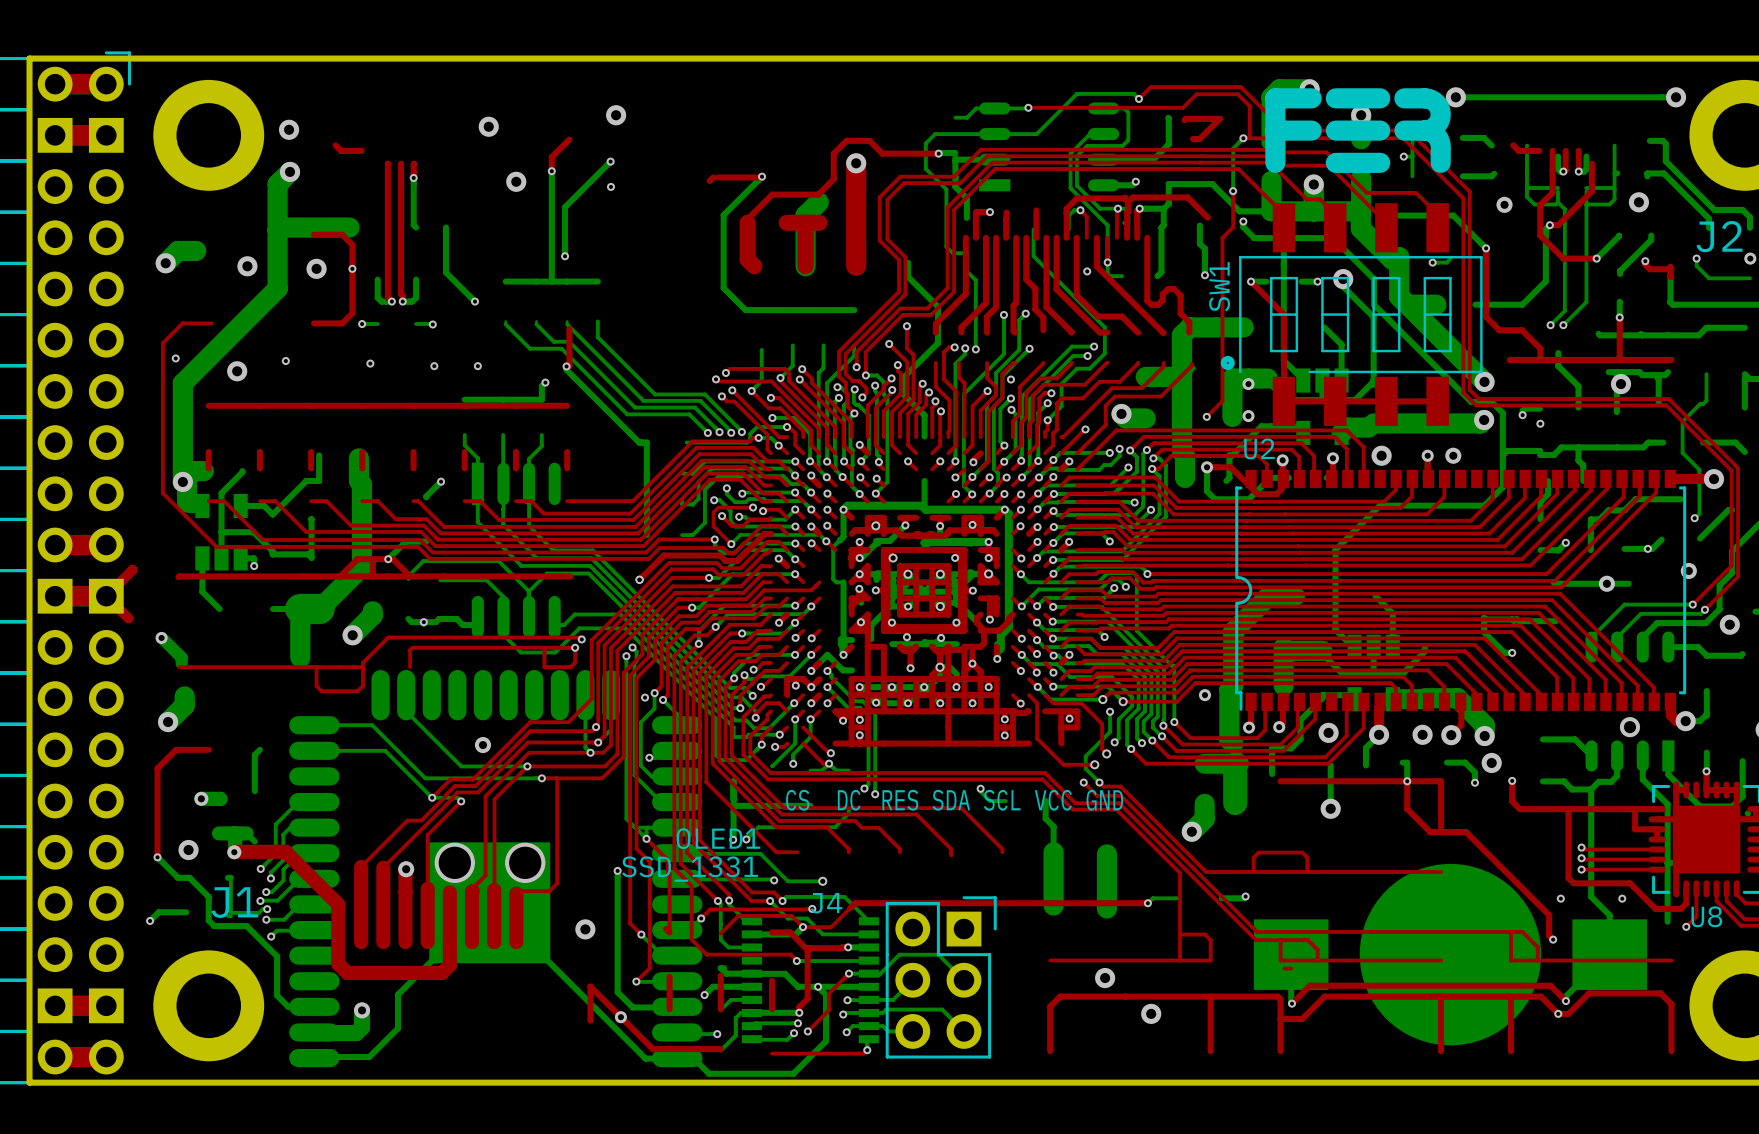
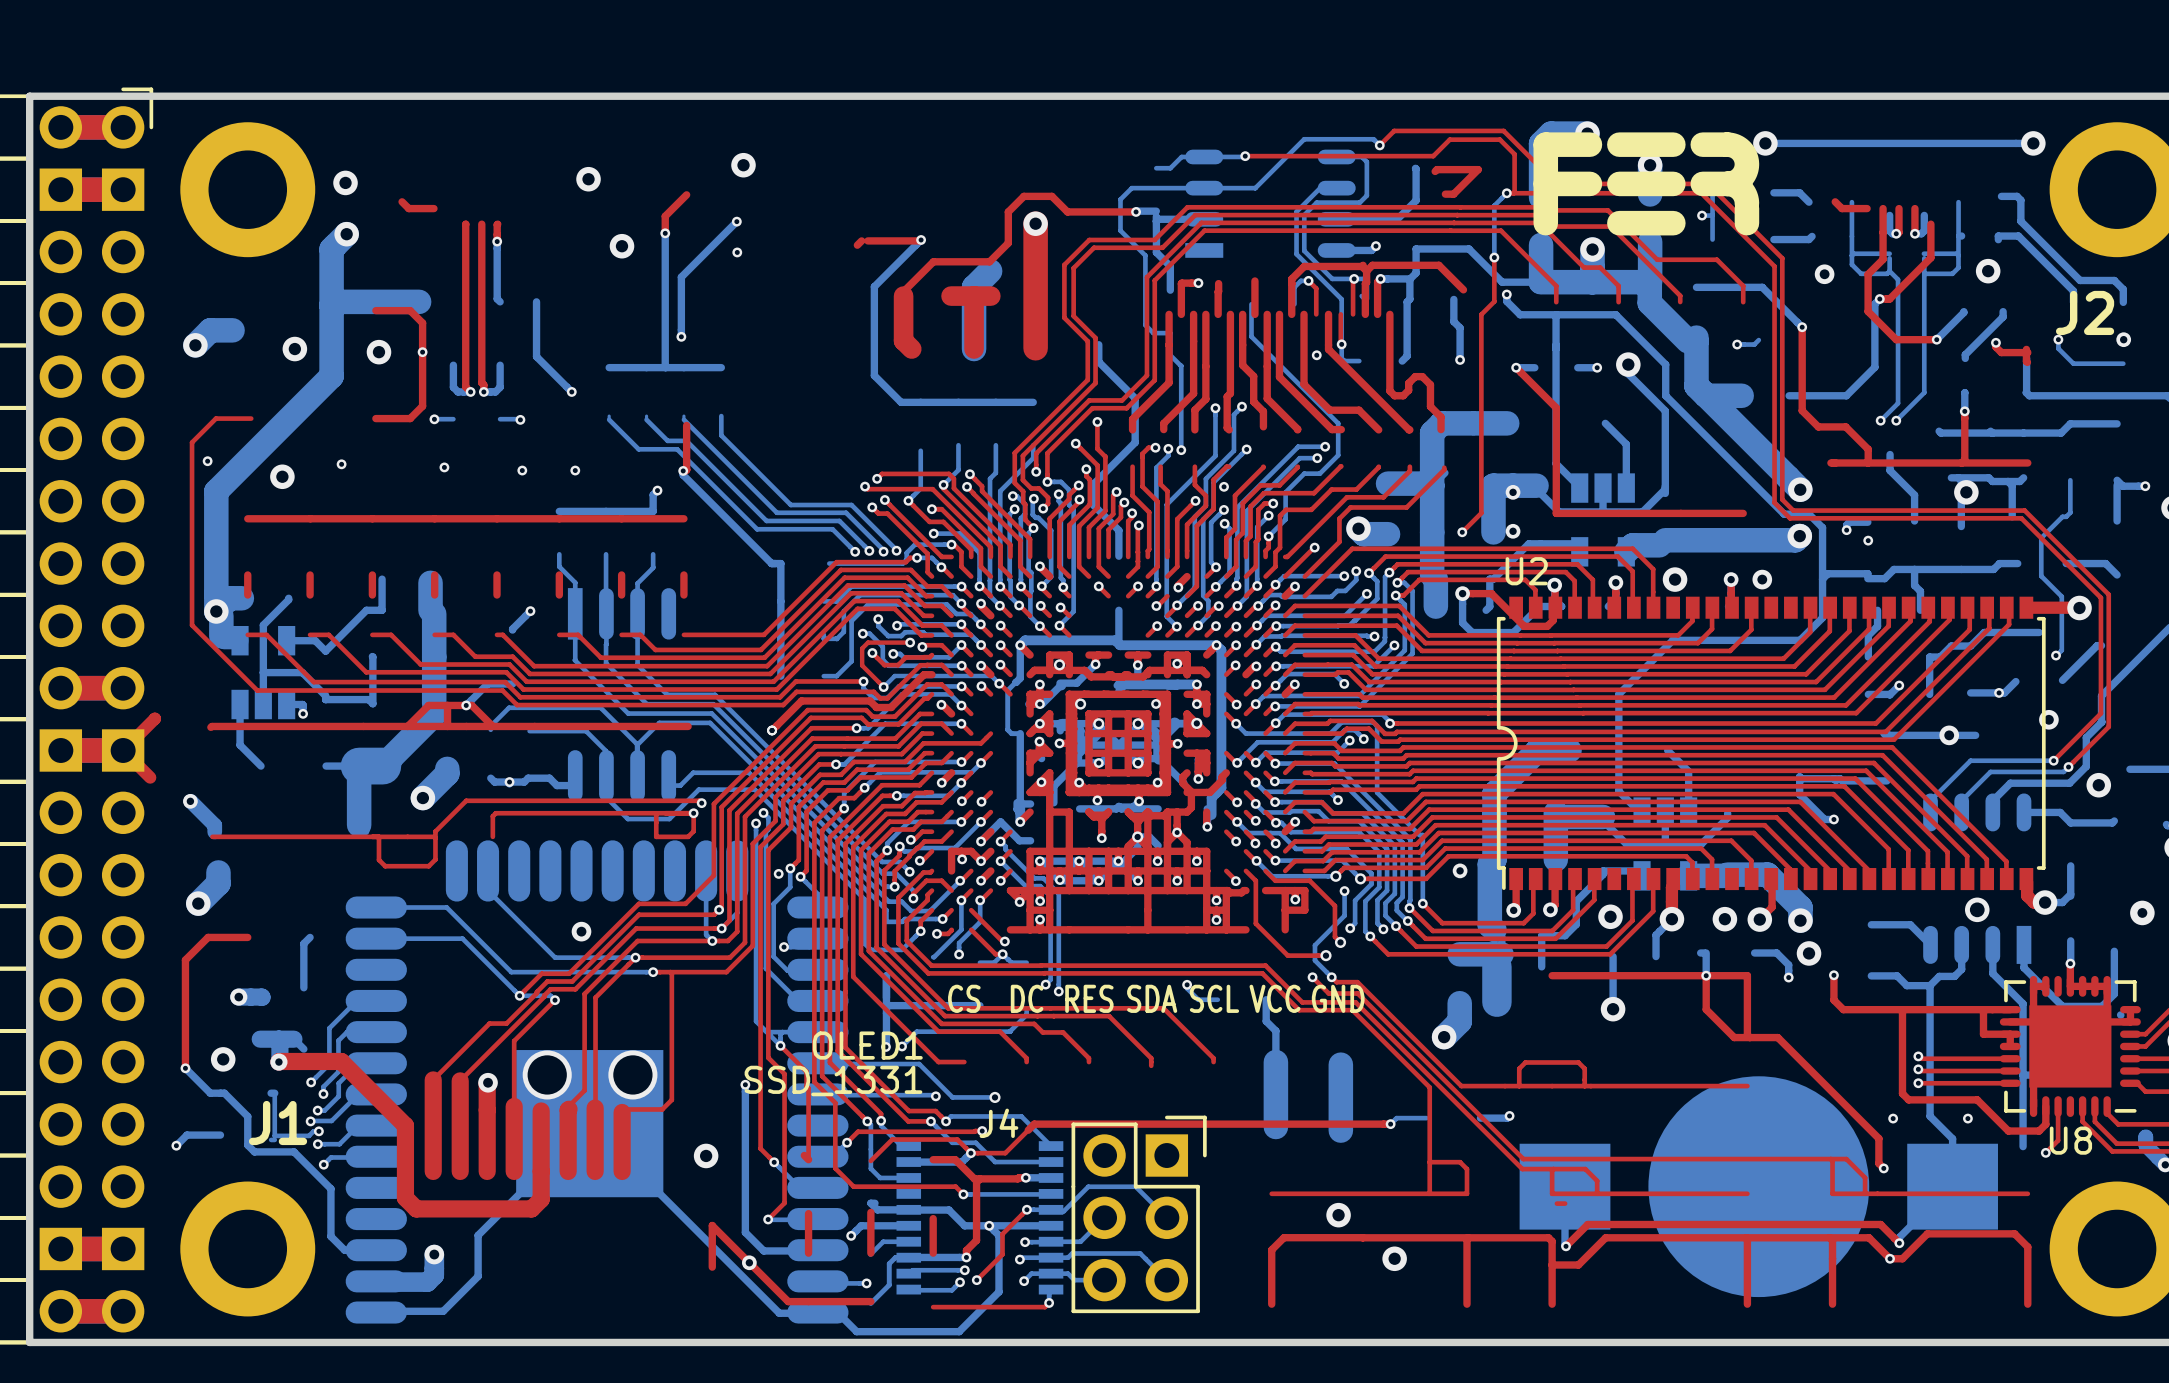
SW1: (1351, 314) -> none

